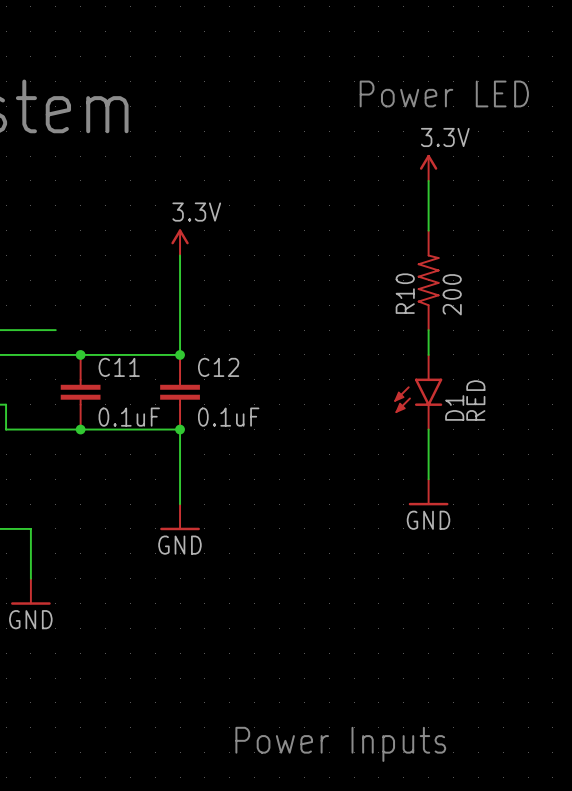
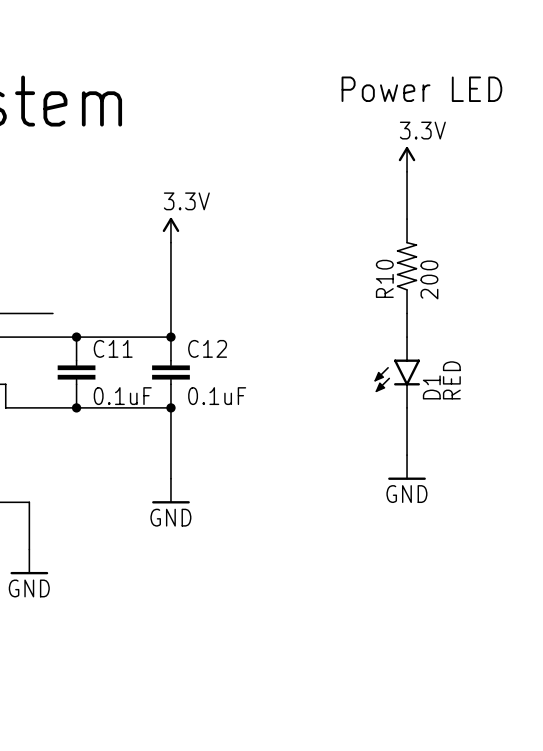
text: Power Inputs (340, 744) -> none

